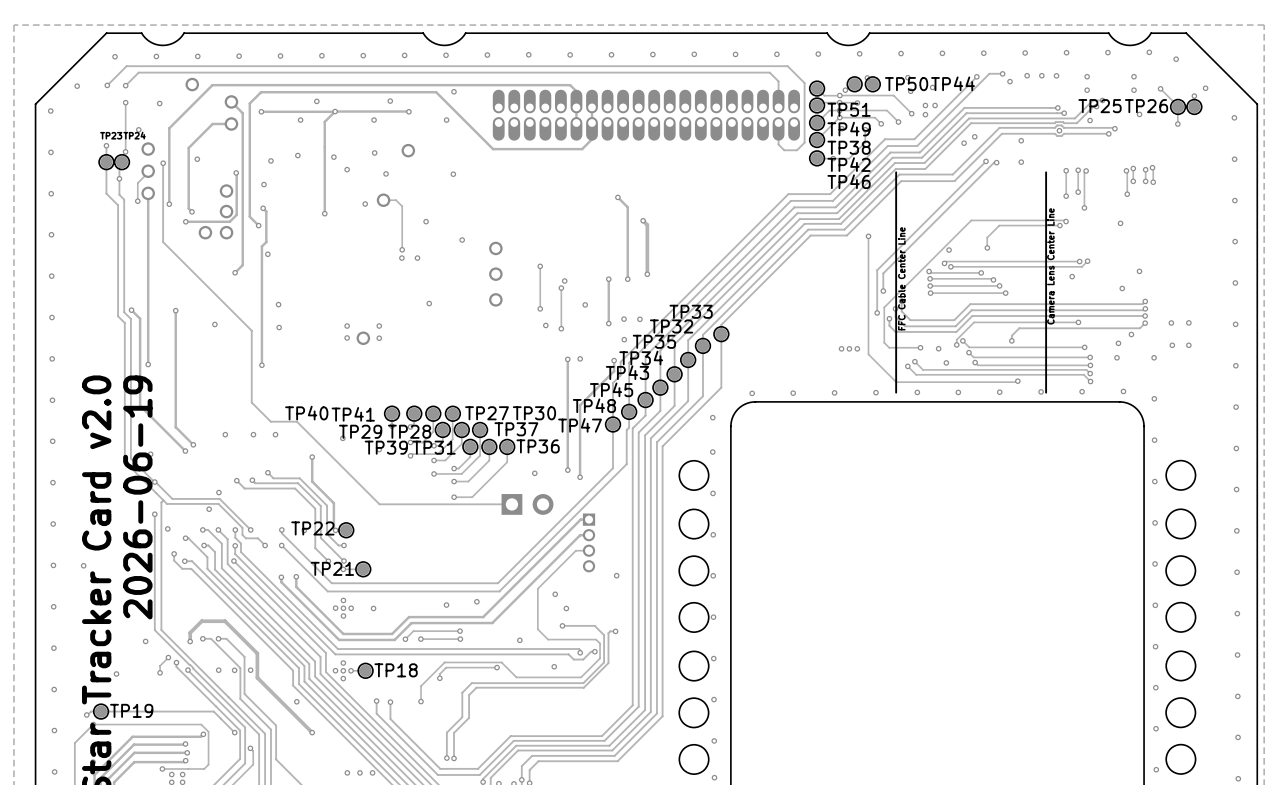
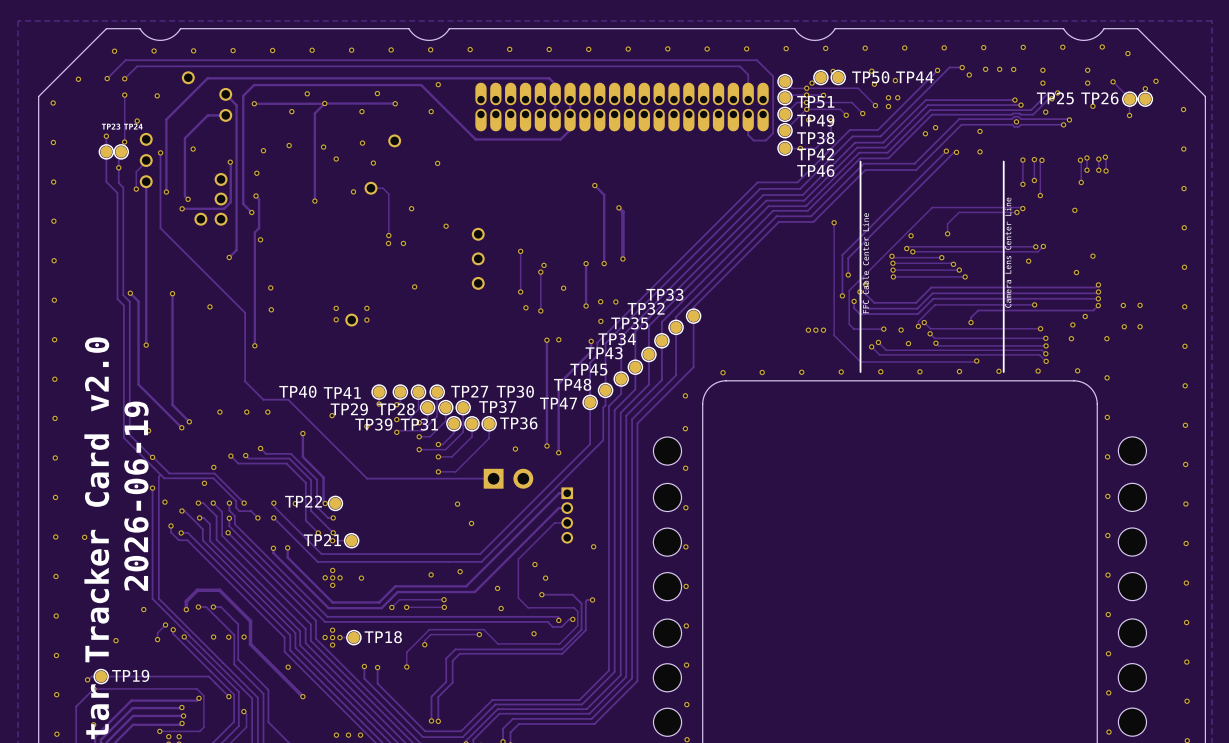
via: none -> (457, 504)
via: none -> (471, 523)
via: none -> (497, 588)

